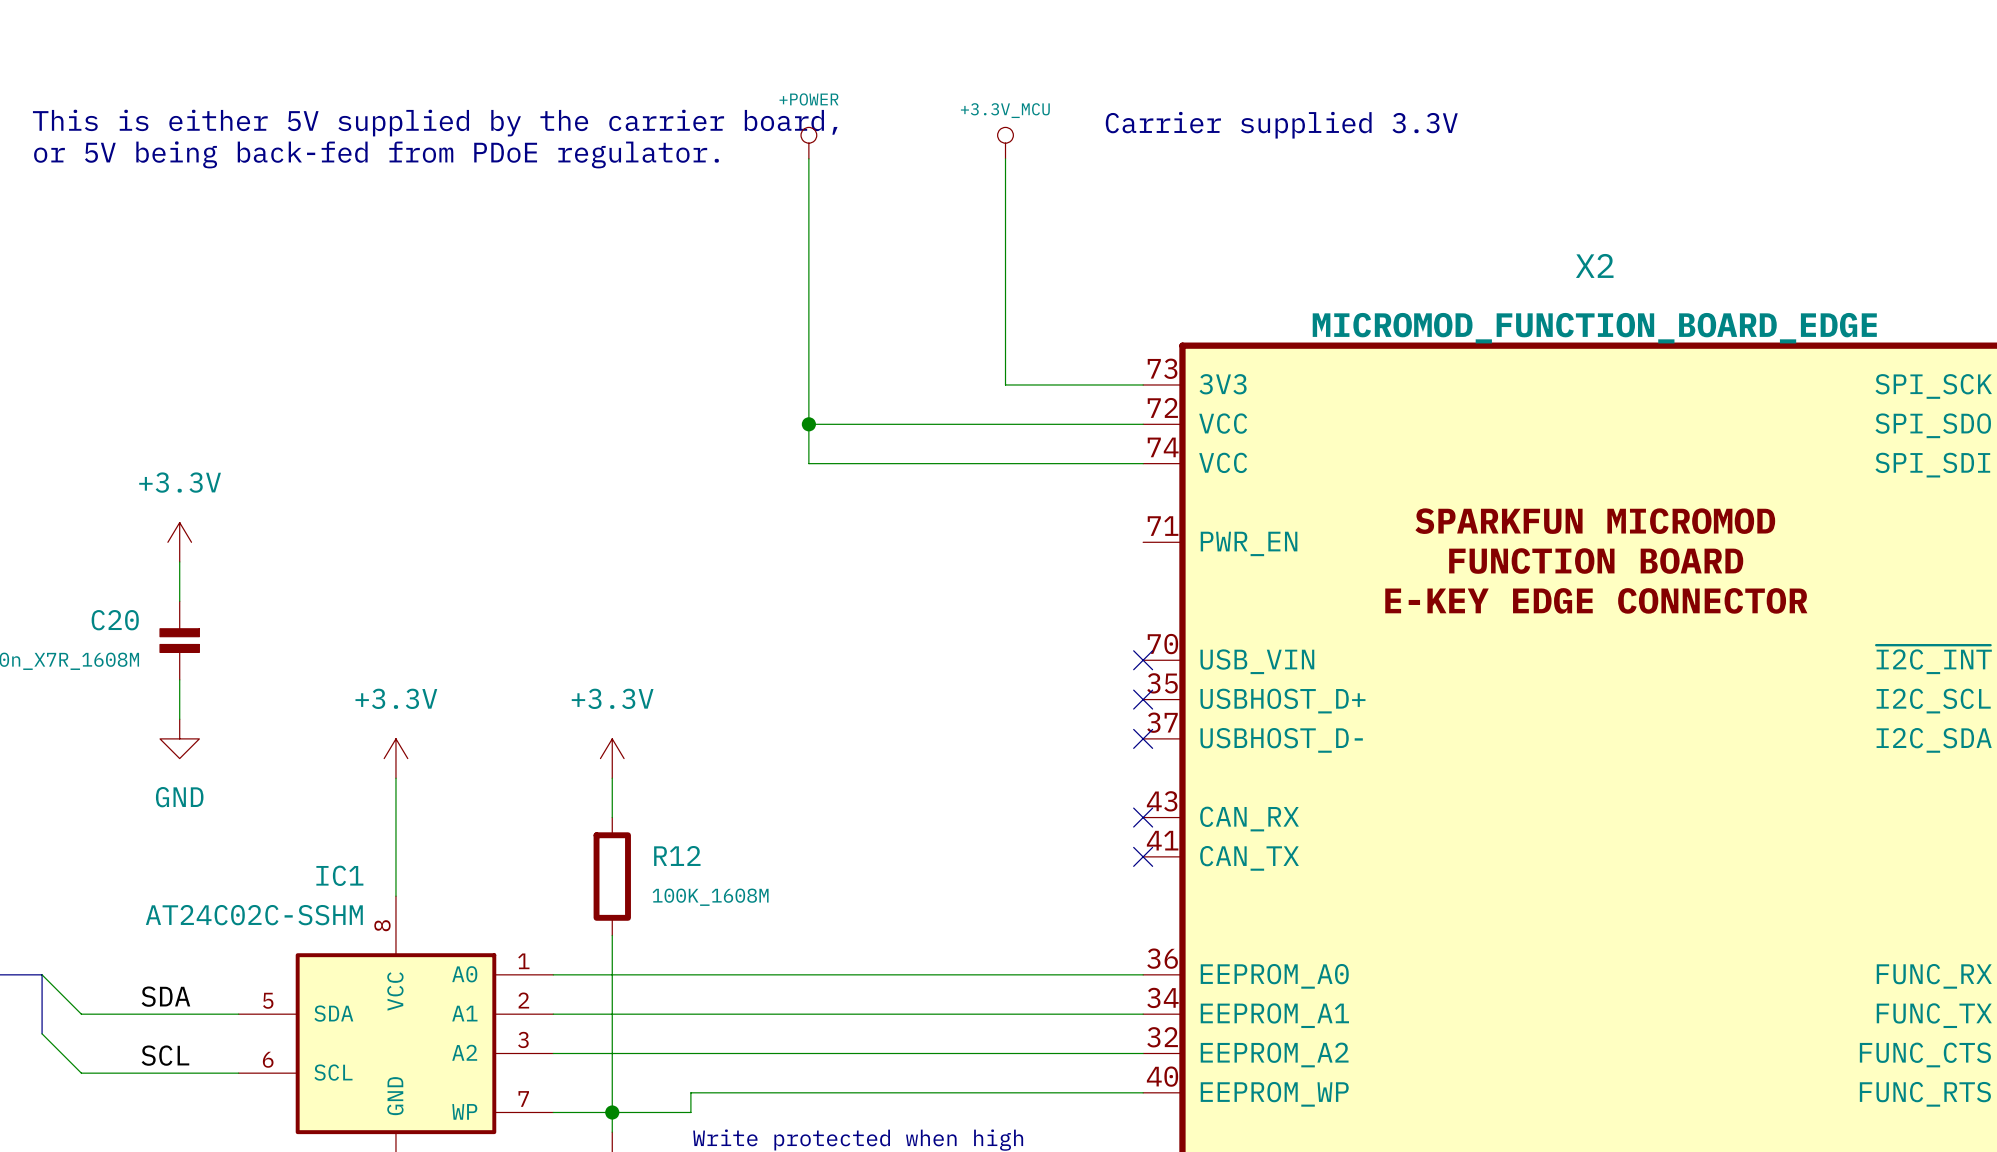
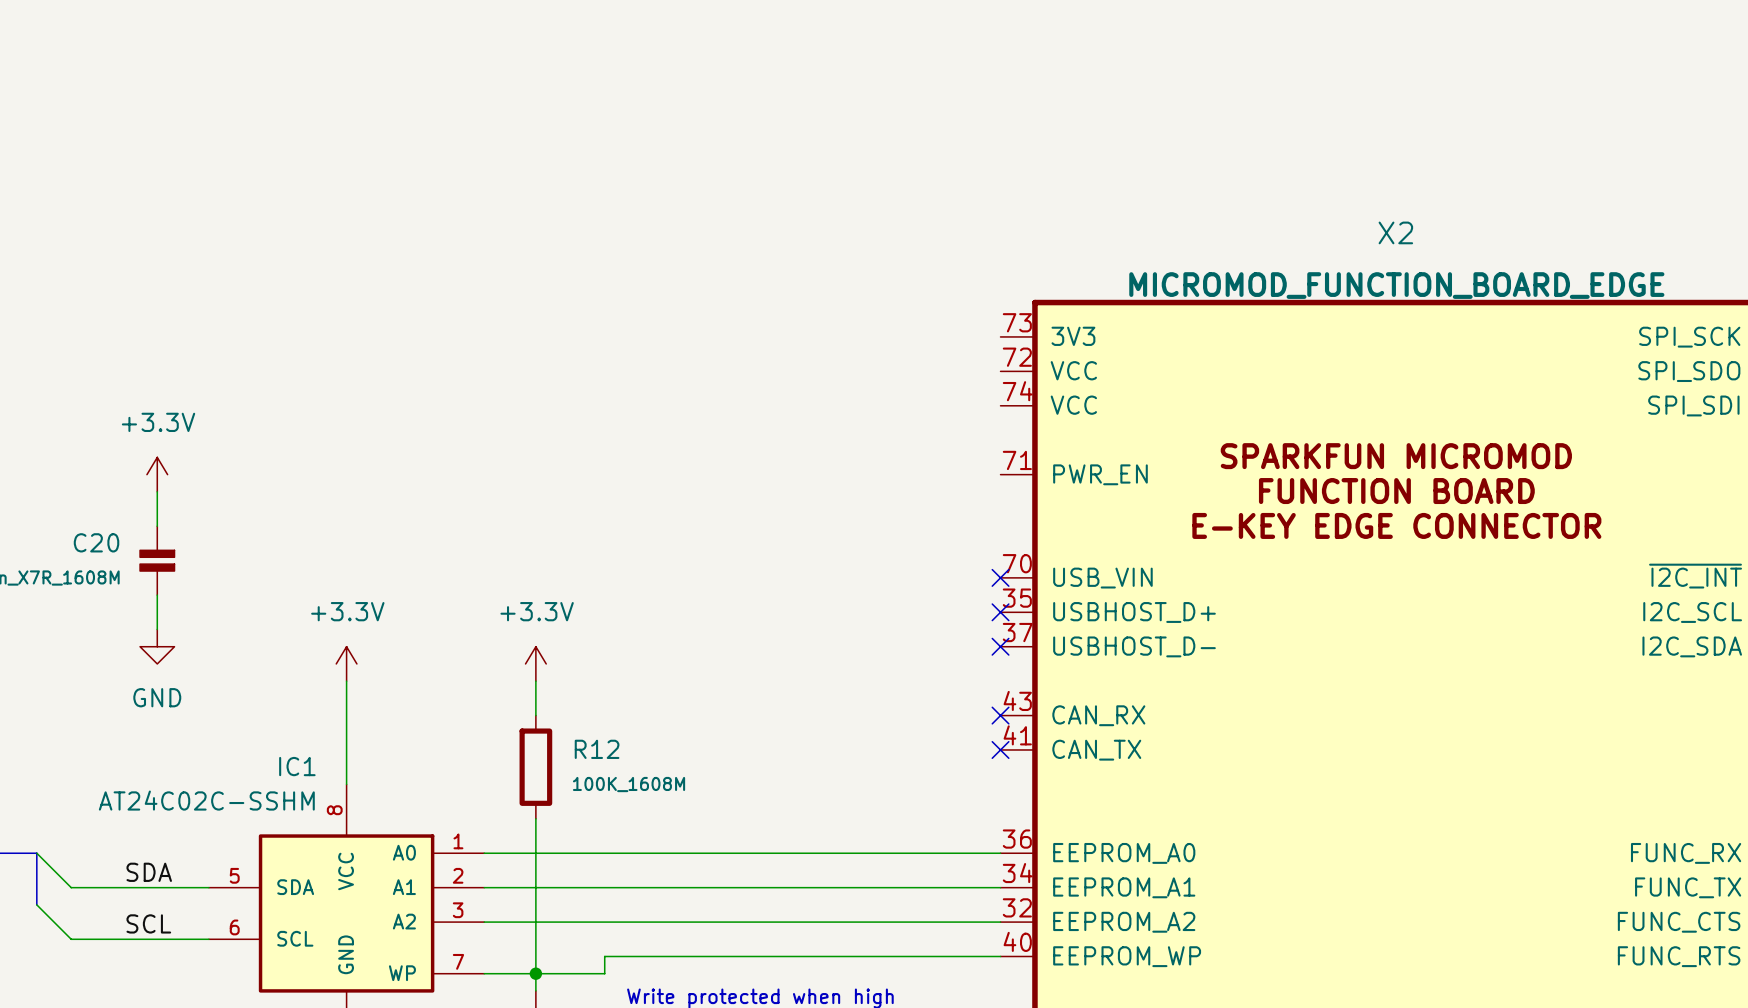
text: This is either 5V supplied by the carrier board, (435, 123) -> none
text: Carrier supplied 3.3V (1281, 125) -> none
power symbol: +POWER (808, 143) -> none
power symbol: +3.3V_MCU (1005, 143) -> none
text: or 5V being back-fed from PDoE regulator. (376, 154) -> none
wire: (808, 158) (808, 463) (1143, 463) -> none
wire: (1005, 158) (1005, 384) (1143, 384) -> none
wire: (808, 424) (1143, 424) -> none
junction: (808, 424) -> none

